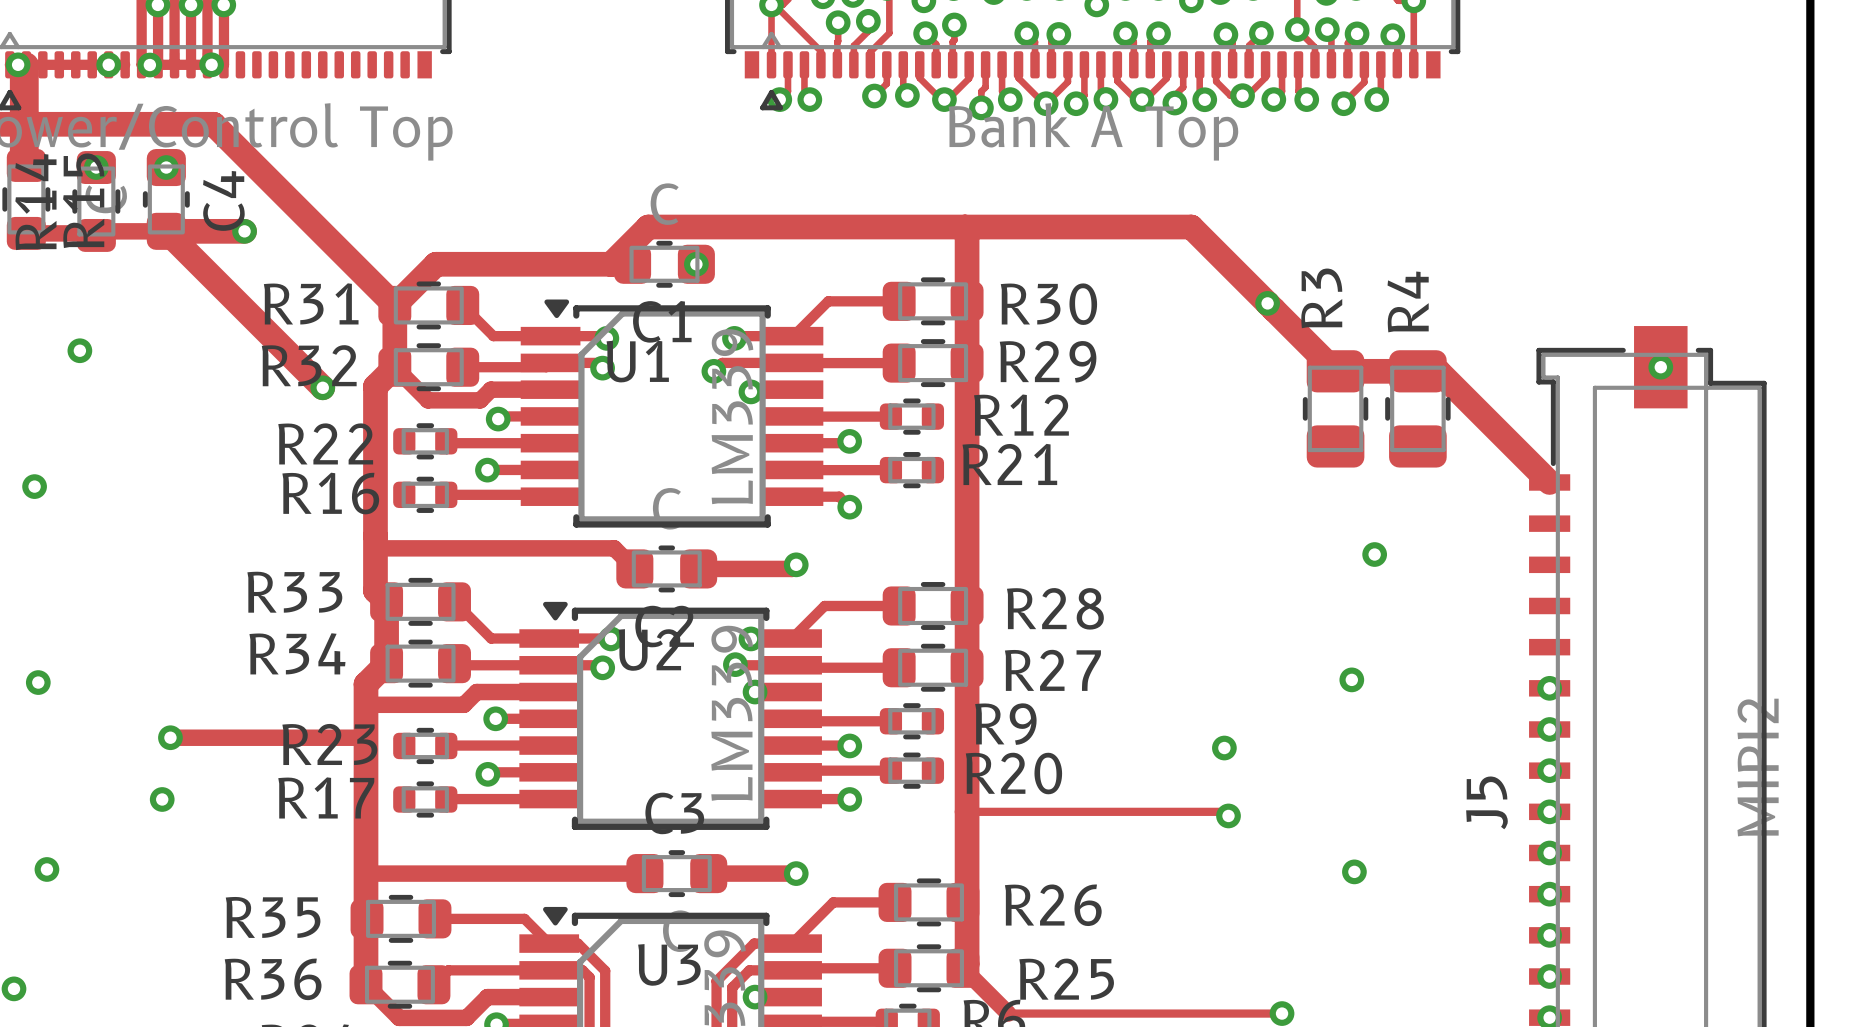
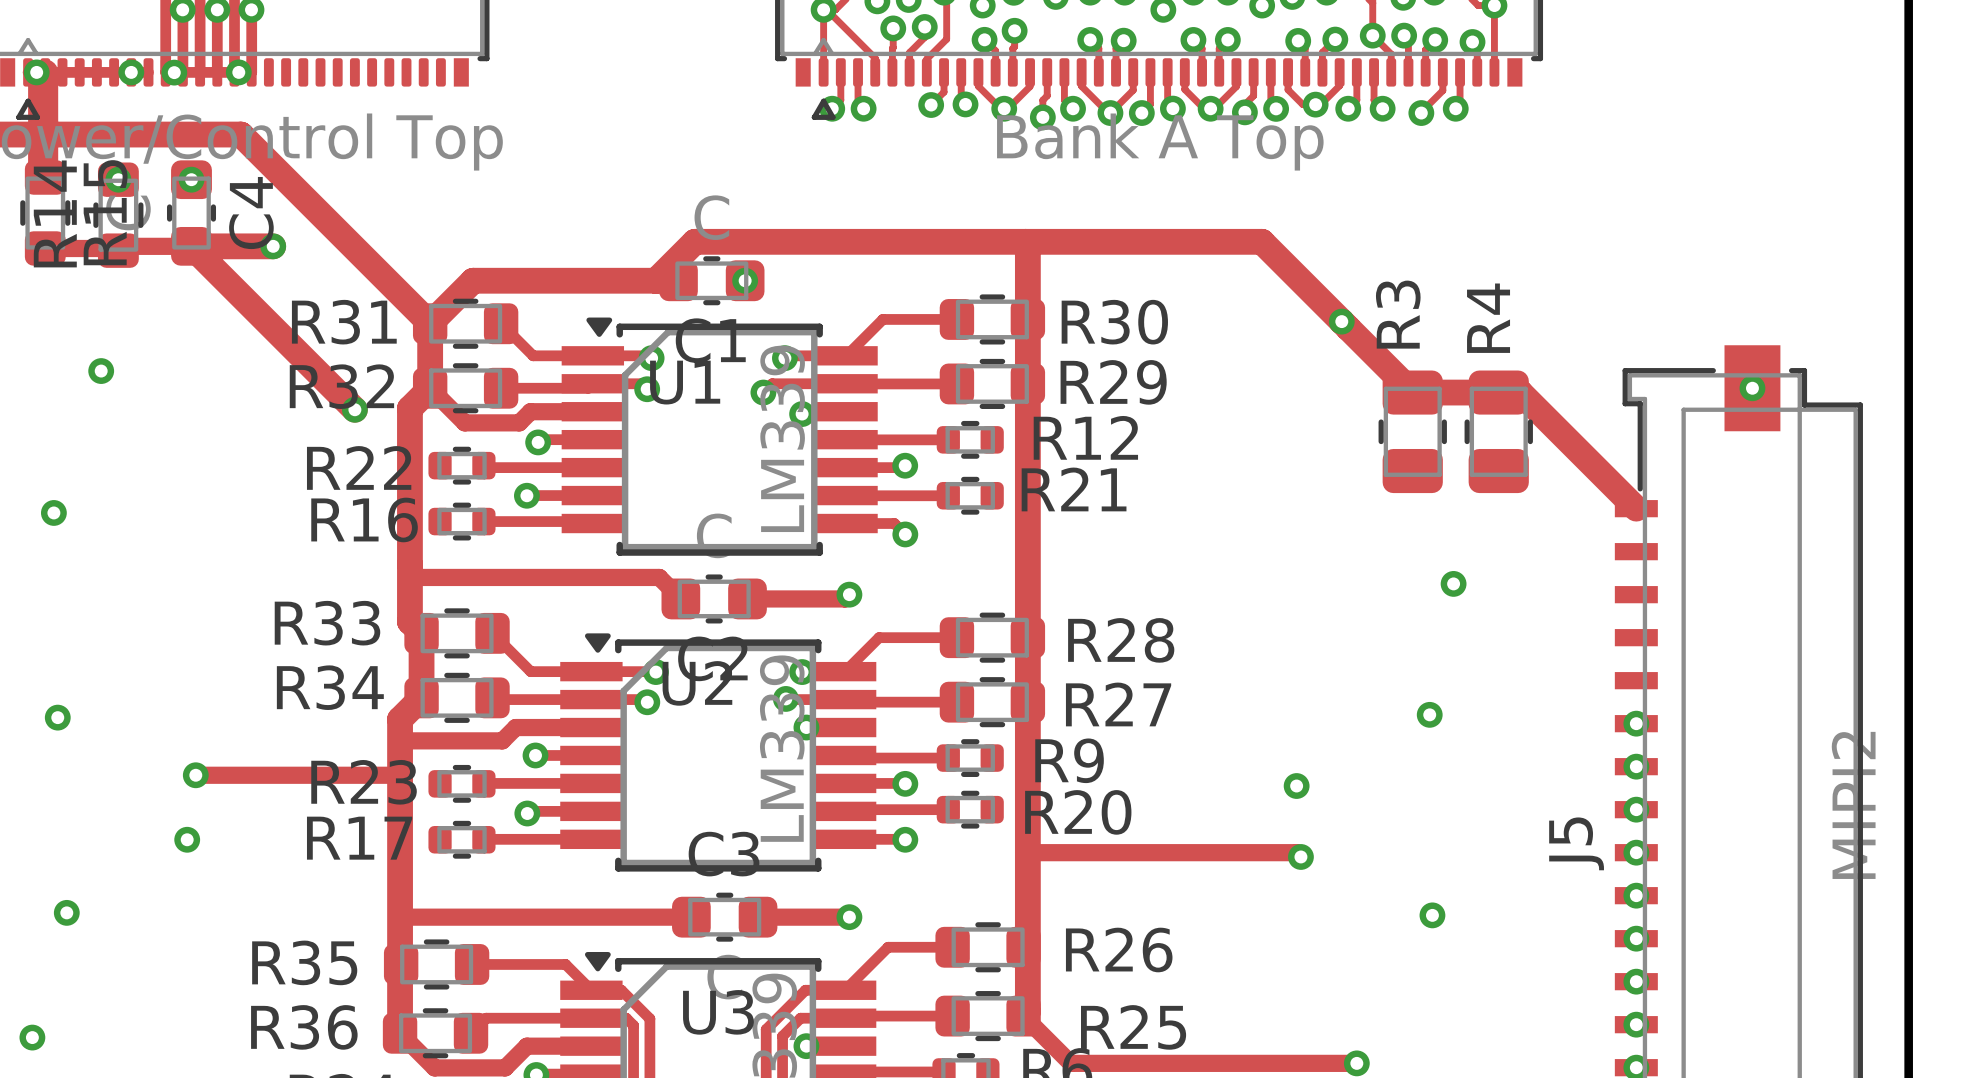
track width: thin (967, 811) (1224, 811) (1228, 815) -> thick (1027, 852) (1296, 852) (1300, 856)
track width: thin (1008, 1013) (1282, 1013) -> thick (1070, 1063) (1356, 1063)

